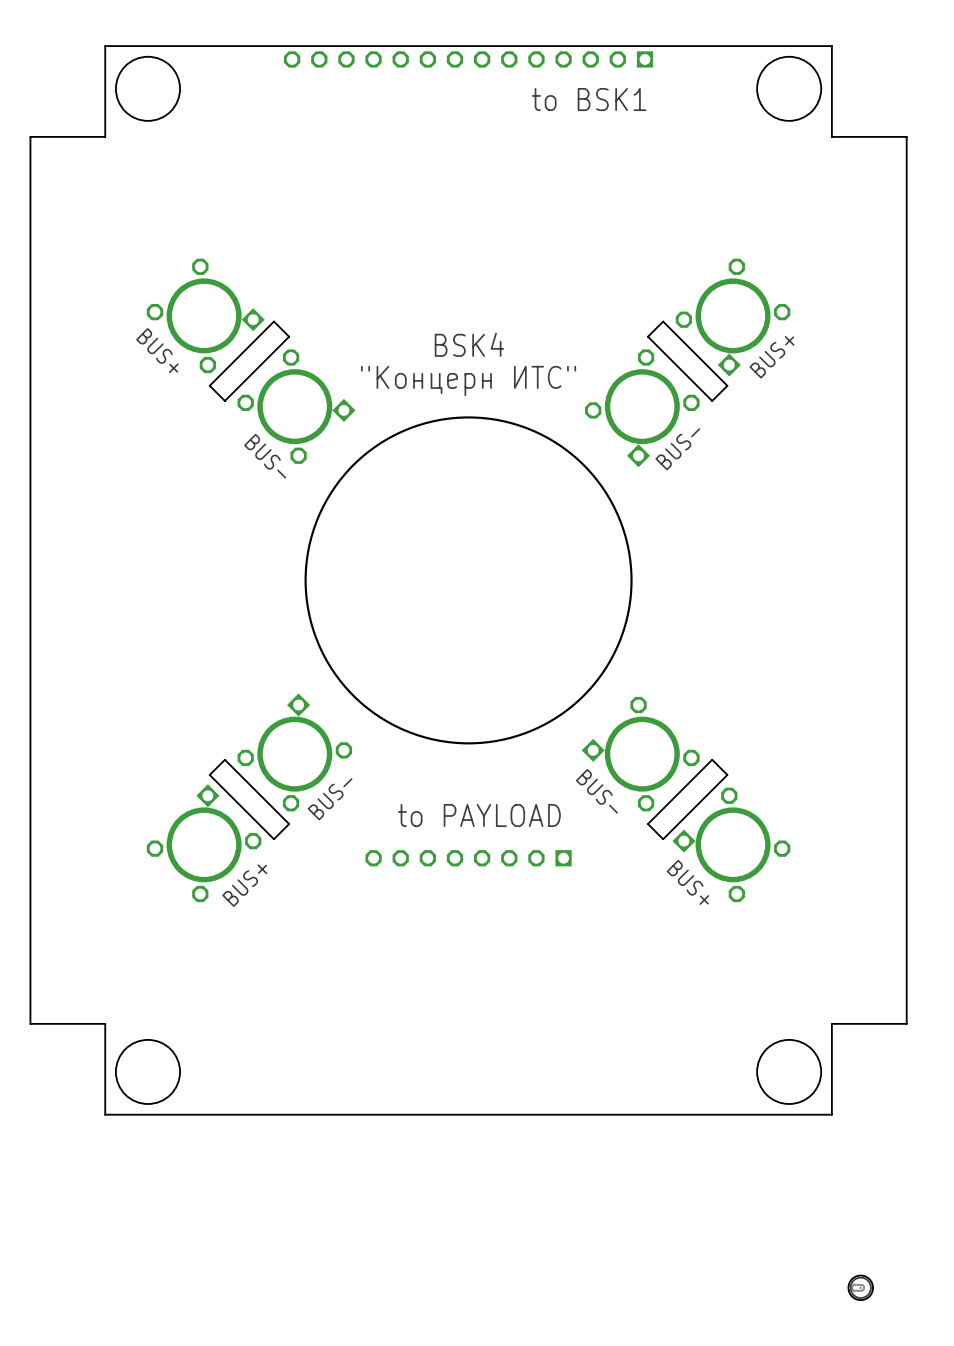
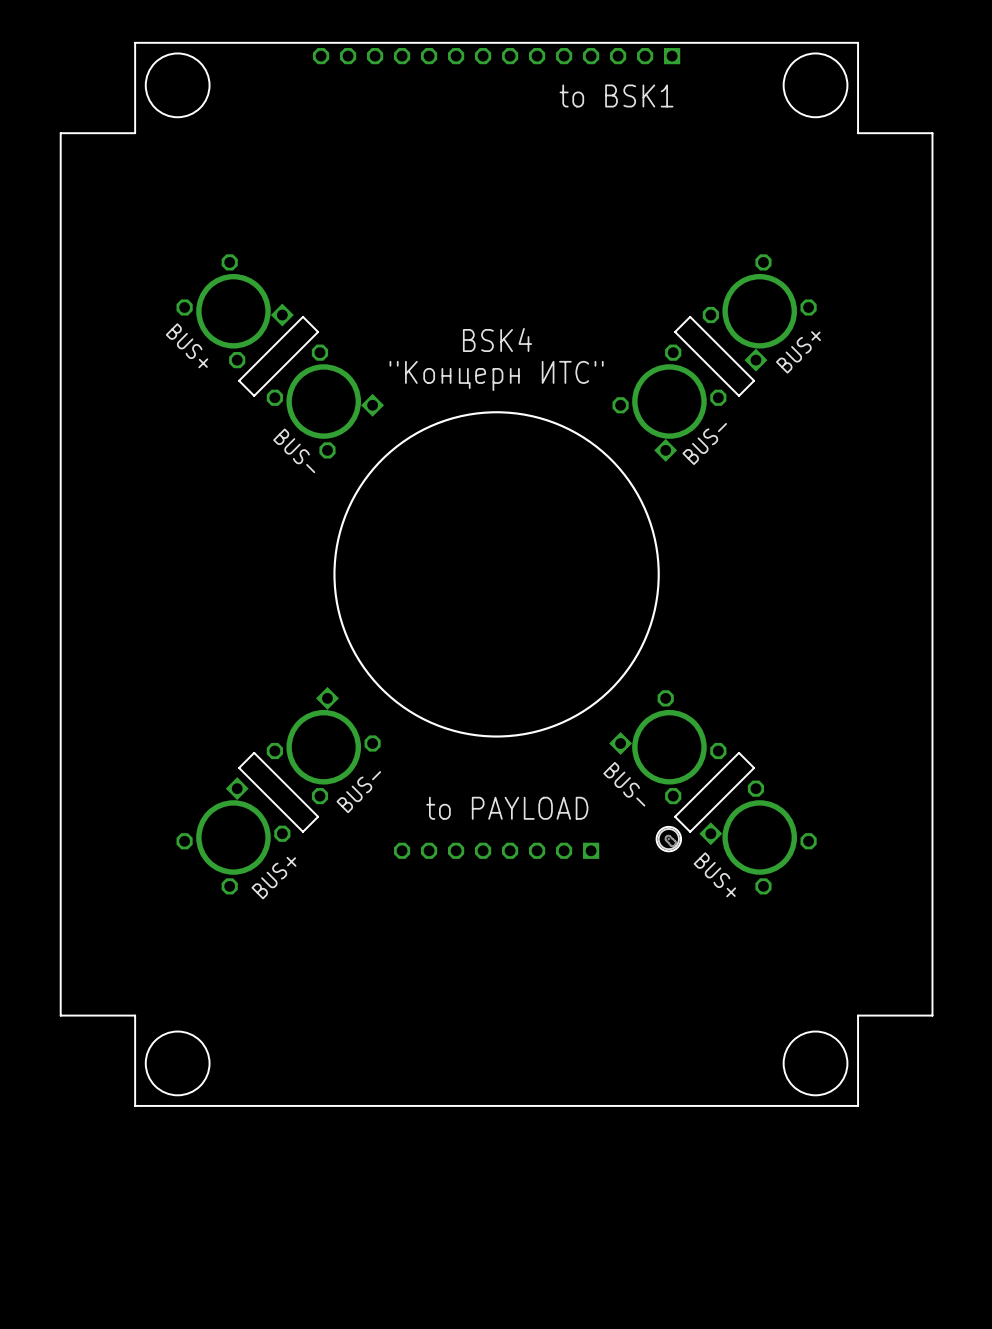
part: none -> (668, 839)
part: (860, 1287) -> none

